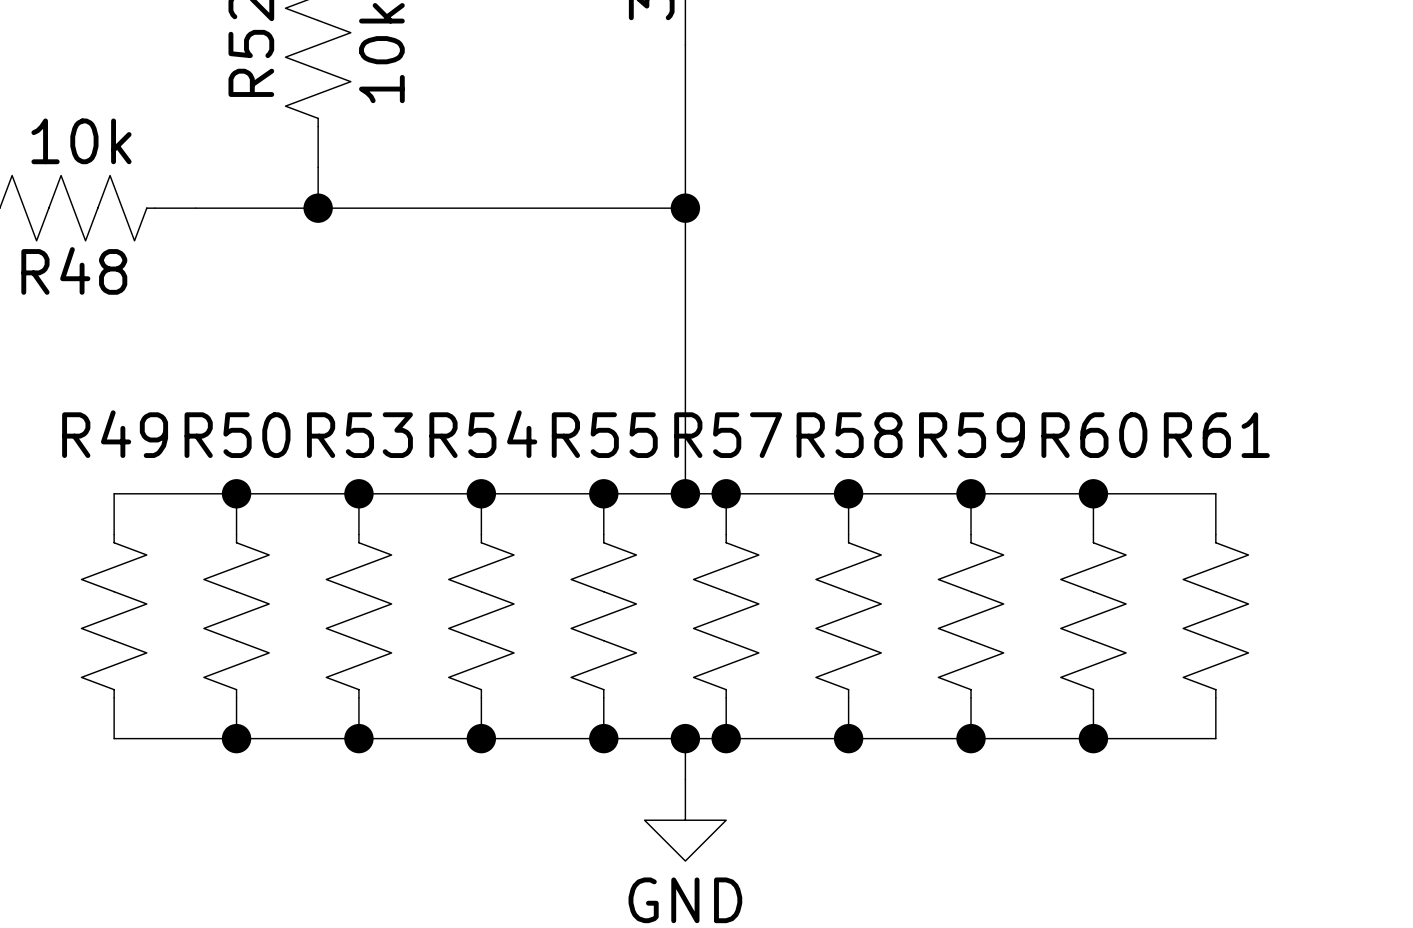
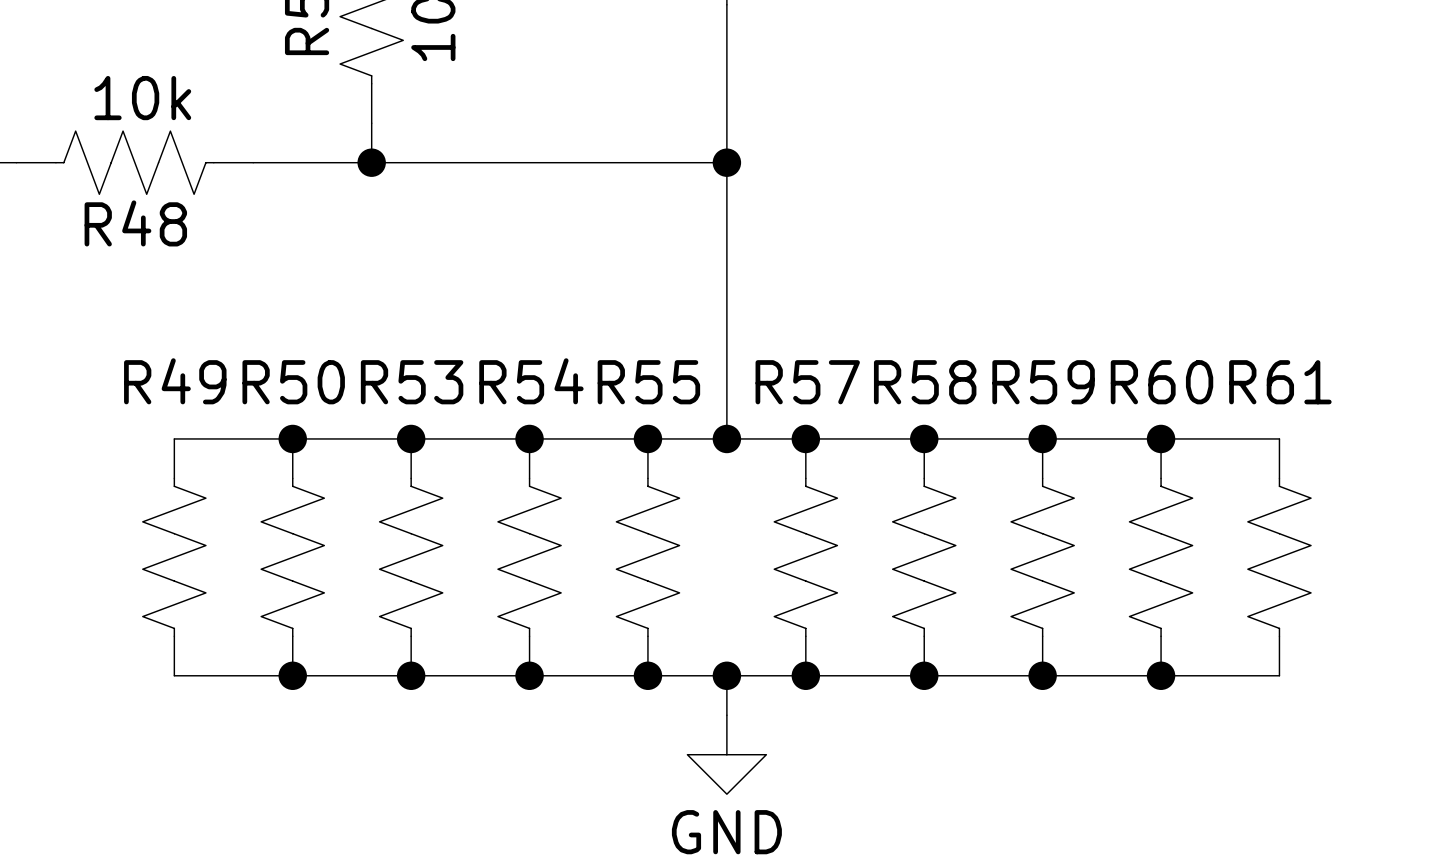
junction: (726, 493) -> none
junction: none -> (805, 438)
junction: (848, 493) -> none
junction: none -> (924, 438)
junction: (971, 493) -> none
junction: none -> (1042, 438)
junction: (1093, 493) -> none
junction: none -> (1161, 438)
wire: none -> (1239, 438) (1279, 438)
R57 position: (726, 616) -> (805, 557)
R58 position: (848, 616) -> (924, 557)
R59 position: (971, 616) -> (1042, 557)
R60 position: (1093, 616) -> (1161, 557)
R61 position: (1215, 616) -> (1279, 557)
junction: (726, 738) -> none
junction: none -> (805, 675)
junction: (848, 738) -> none
junction: none -> (924, 675)
junction: (971, 738) -> none
junction: none -> (1042, 675)
junction: (1093, 738) -> none
junction: none -> (1161, 675)
wire: none -> (1239, 675) (1279, 675)

